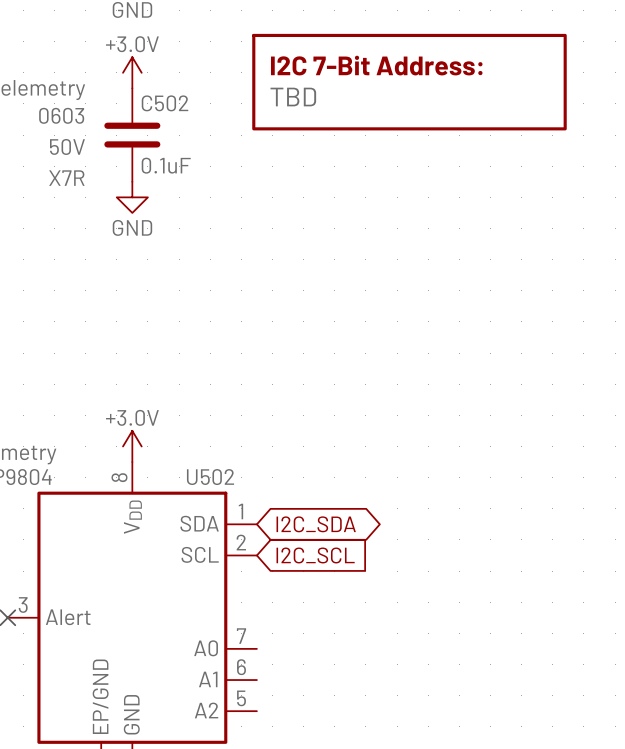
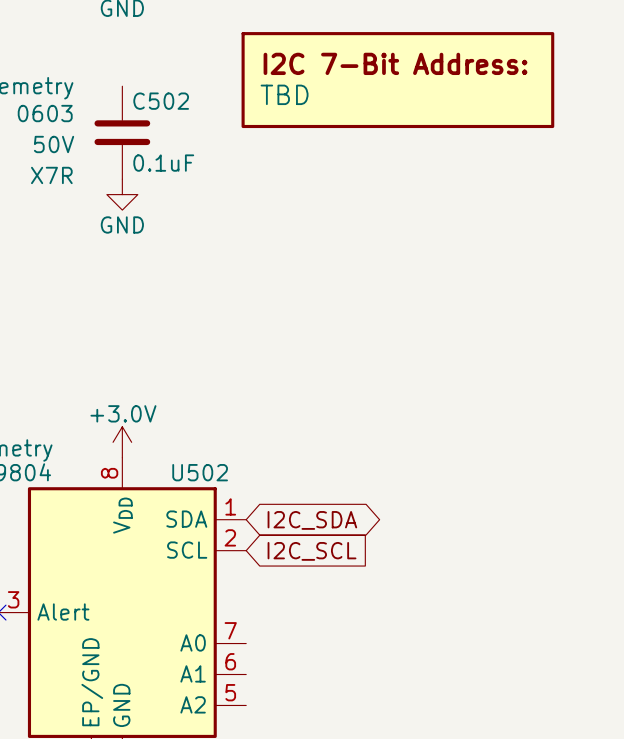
power symbol: +3.0V (132, 72) -> none

